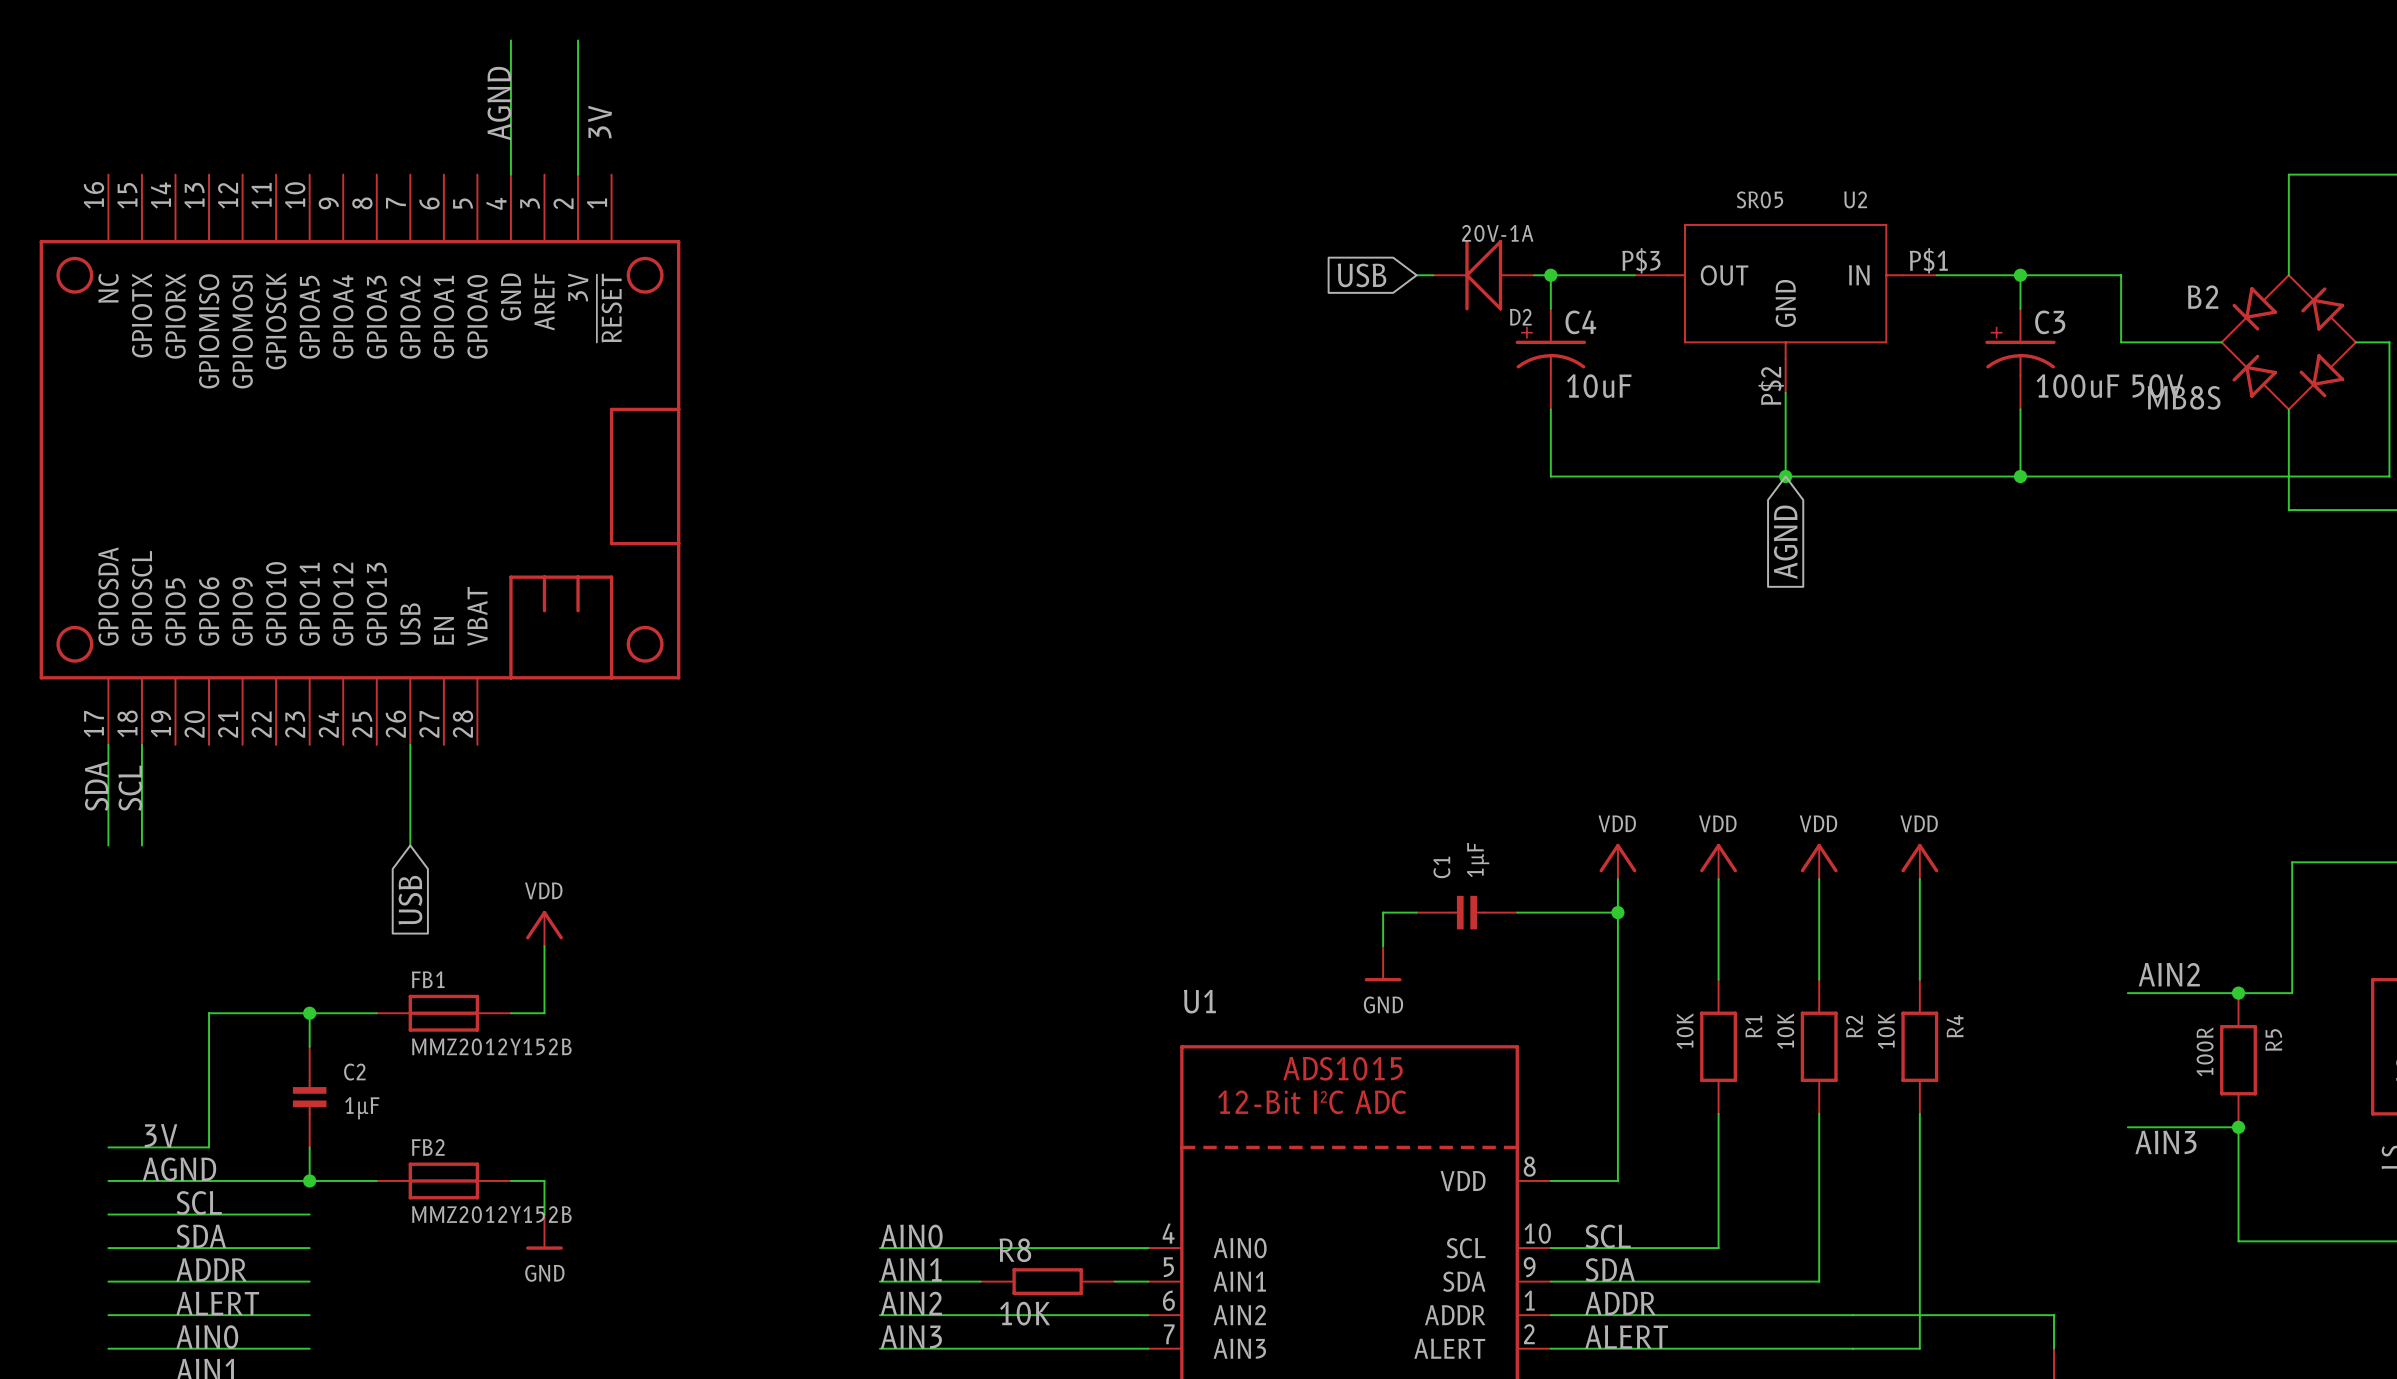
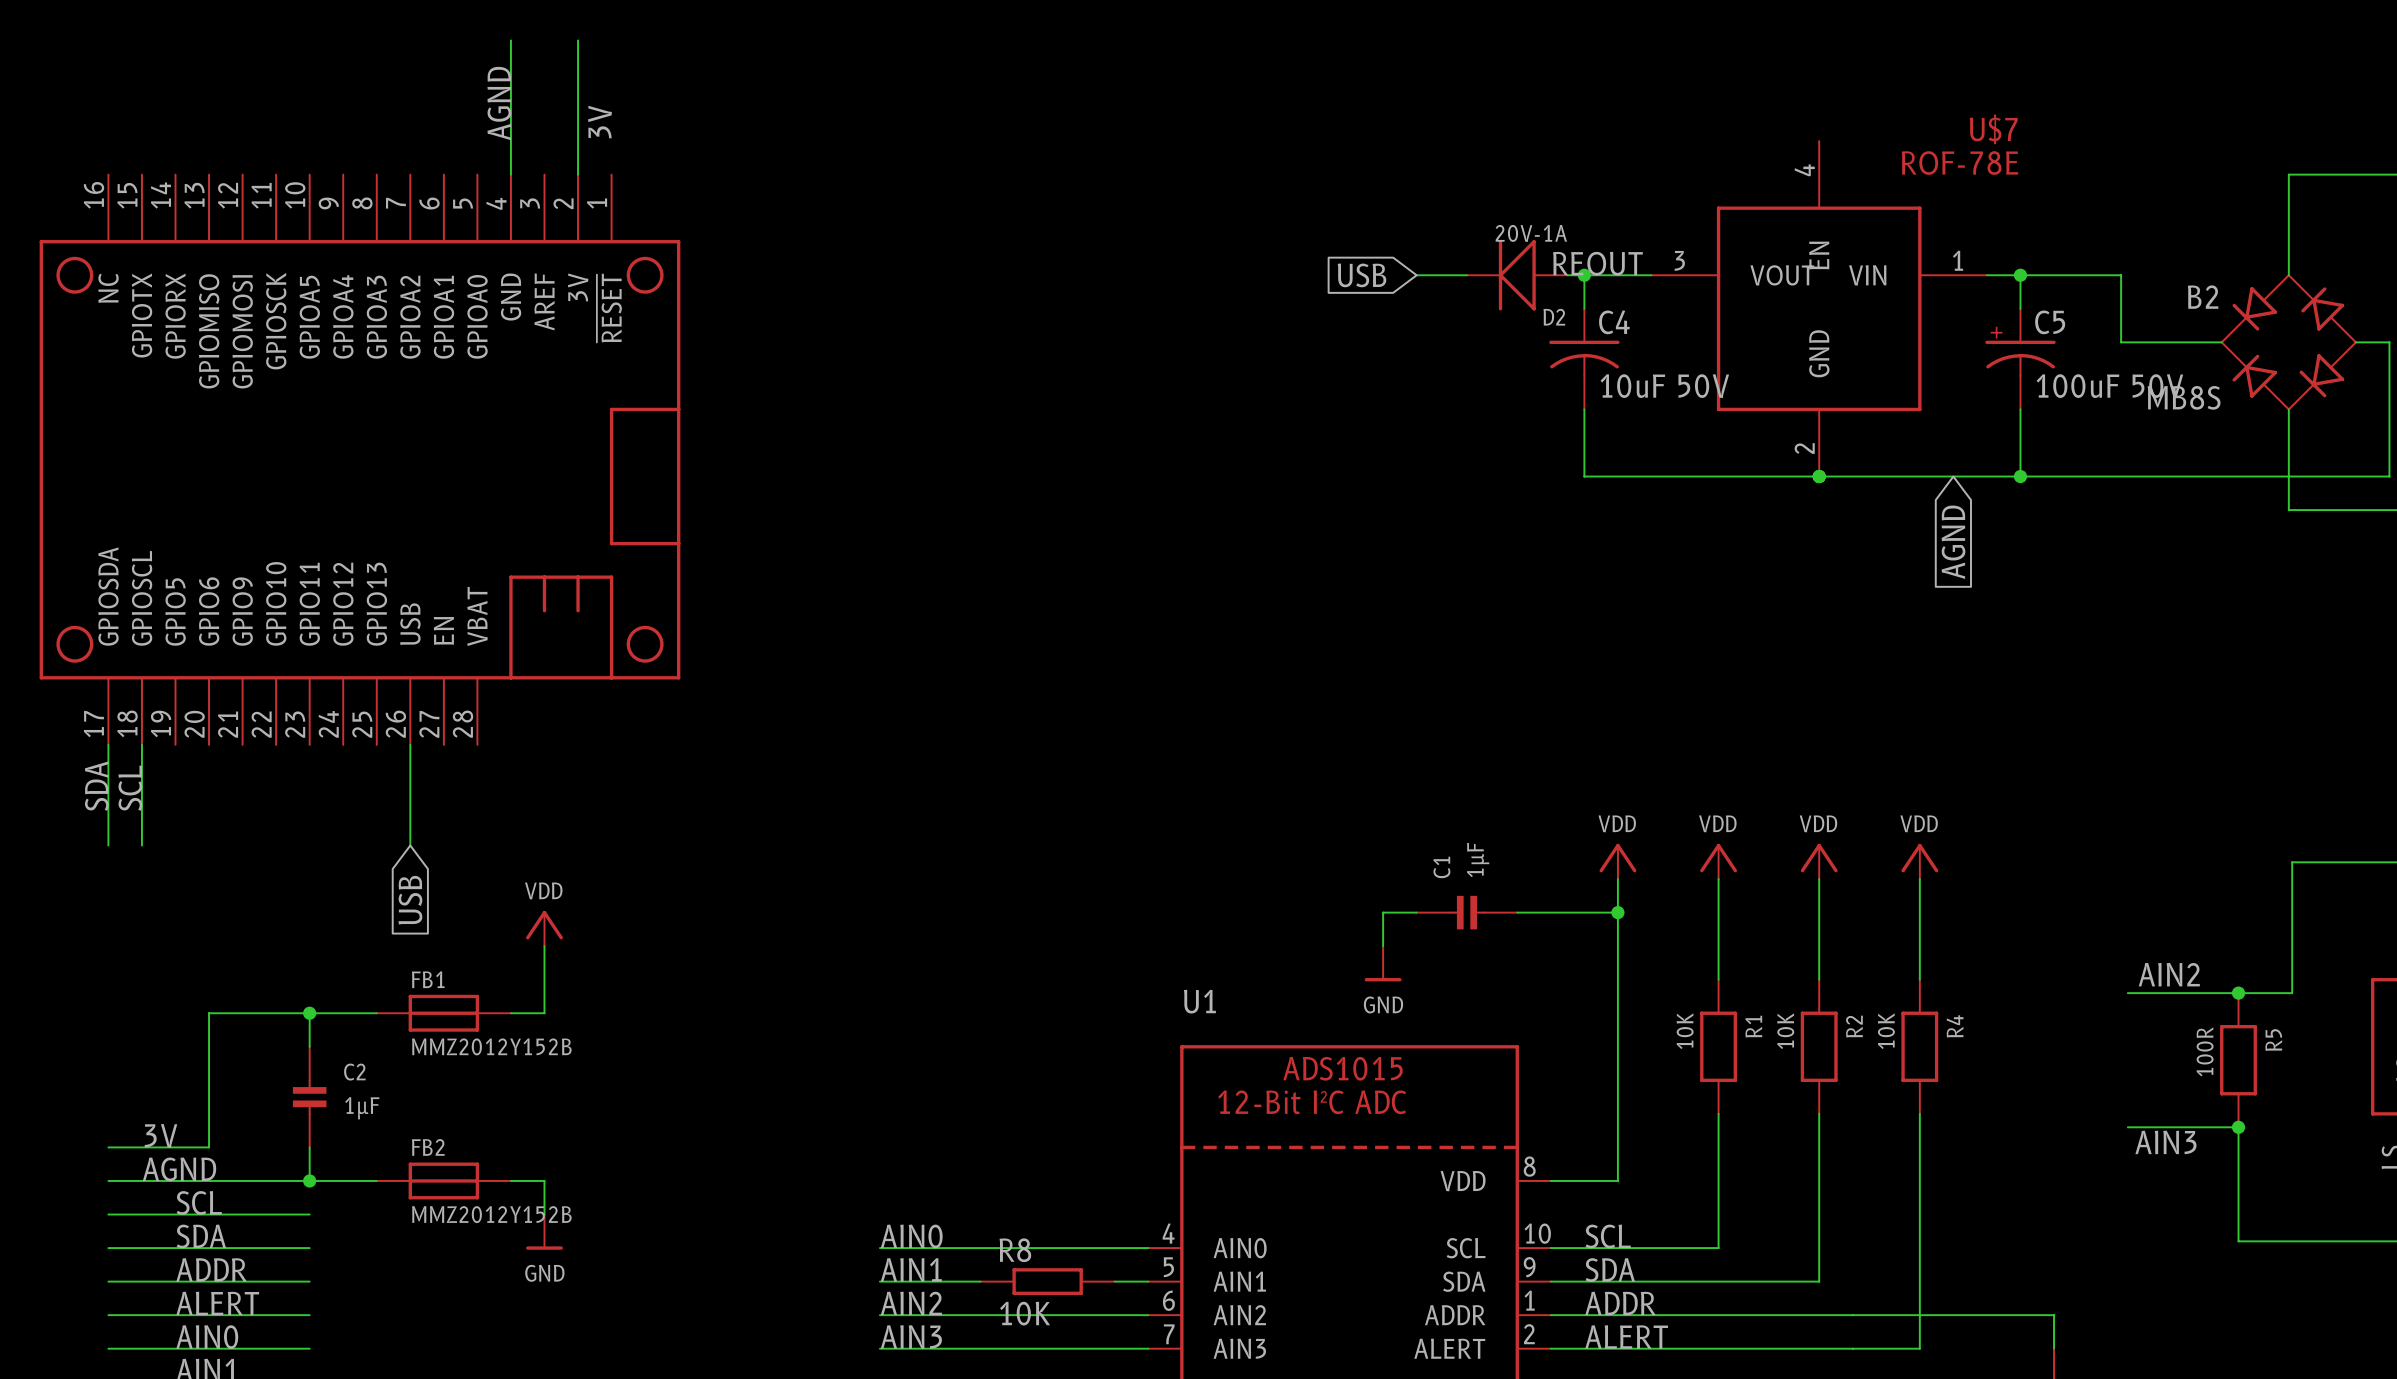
label: none -> REOUT (1597, 263)
D2 position: (1483, 275) -> (1517, 275)
wire: (1550, 275) (1550, 308) -> (1584, 275) (1584, 308)
junction position: (1550, 275) -> (1584, 275)
C4 symbol: [1515, 308, 1587, 410] -> [1549, 308, 1620, 410]
U2: SR05 (1785, 308) -> none
U$7: none -> ROF-78E (1819, 308)
C3 name: C3 (2050, 322) -> C5 (2050, 322)
C4 value: 10uF (1599, 386) -> 10uF 50V (1664, 386)
wire: (1785, 392) (1785, 476) -> none
wire: (1550, 409) (1550, 476) (1584, 476) -> (1584, 409) (1584, 476)
junction position: (1785, 476) -> (1819, 476)
global label position: AGND (1785, 542) -> AGND (1953, 542)

